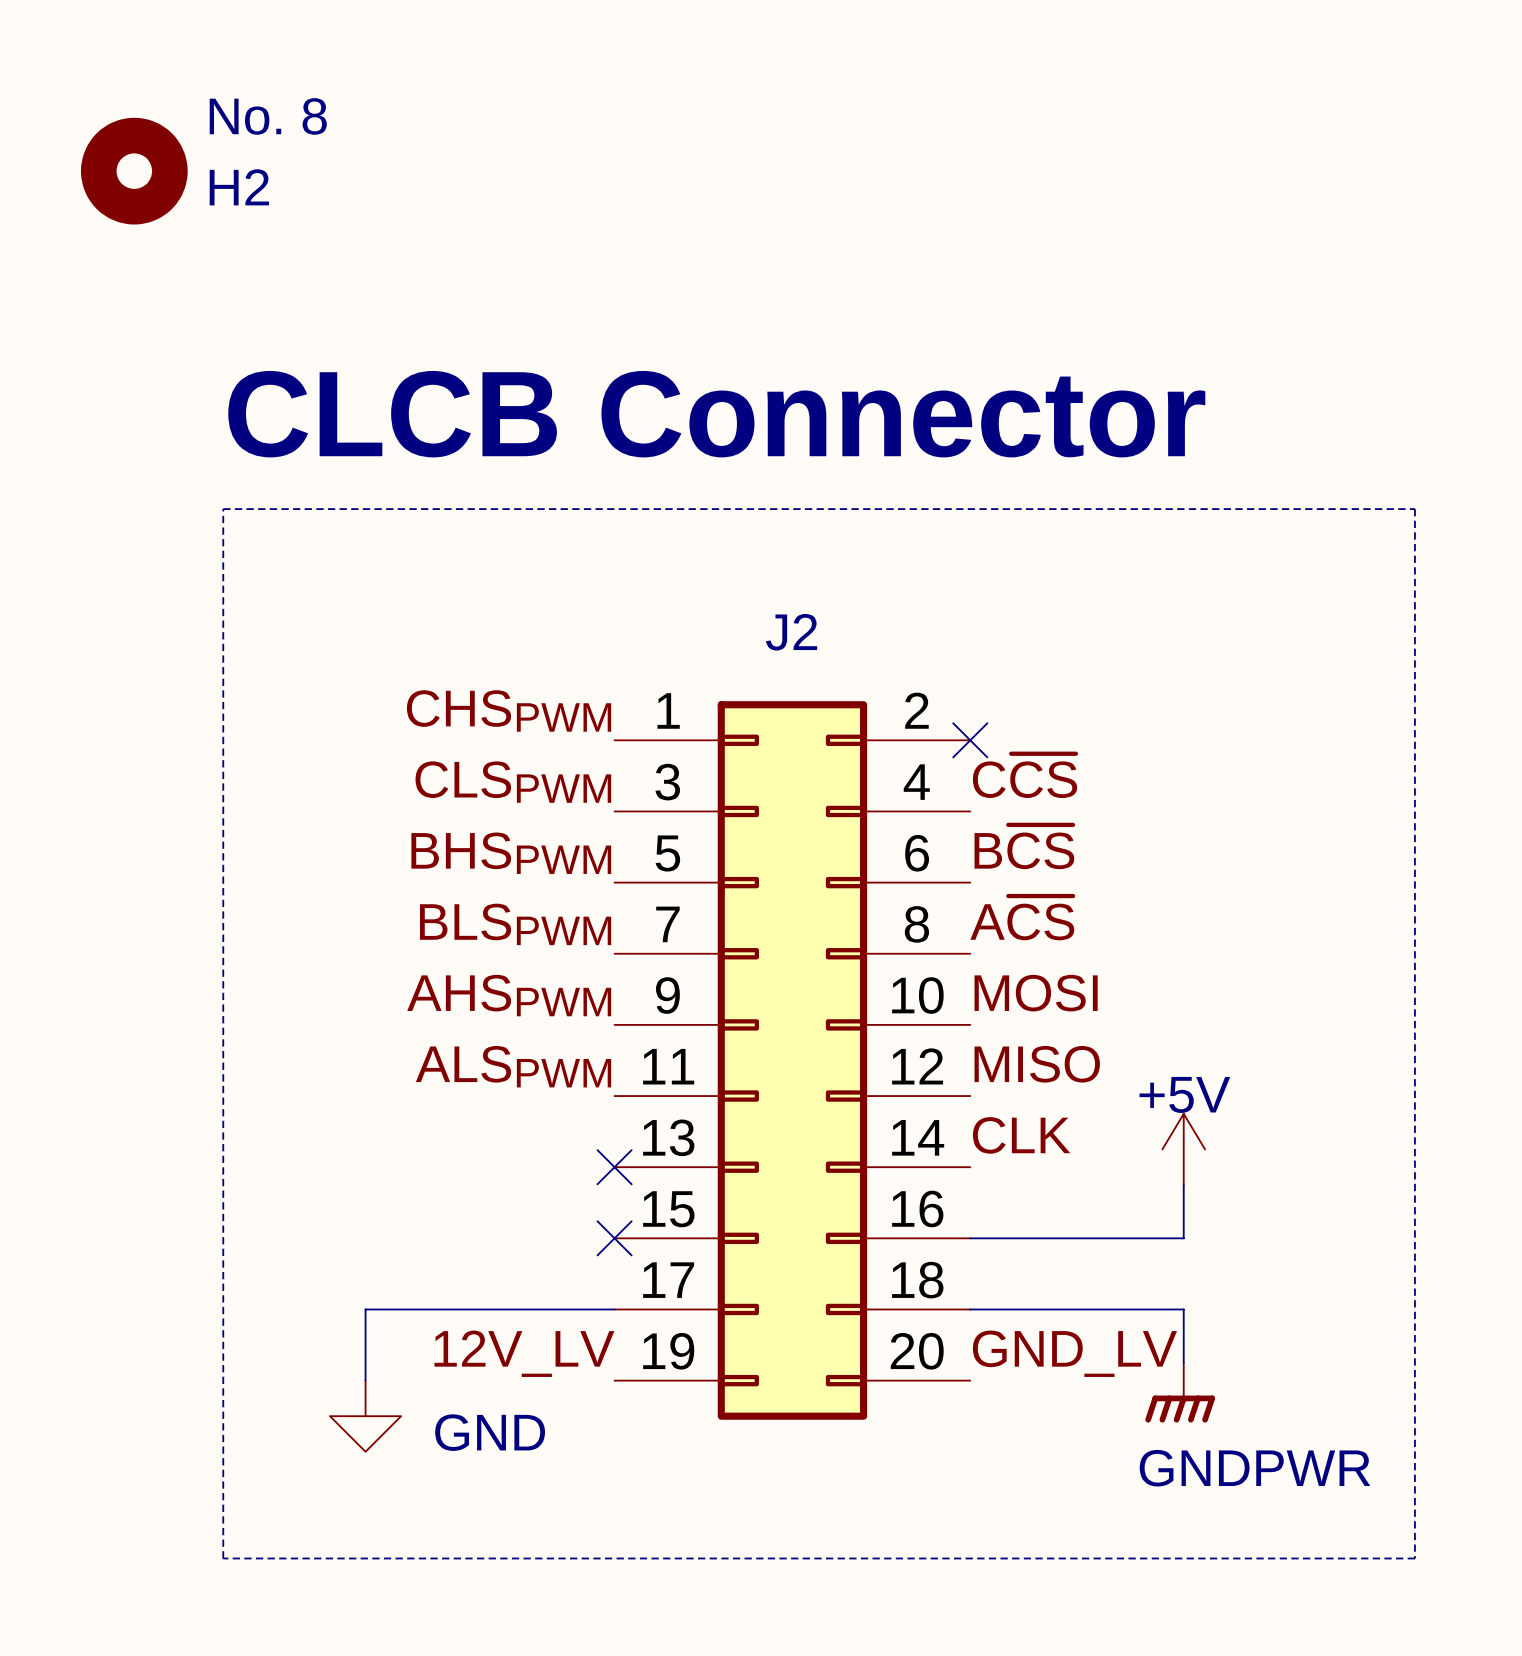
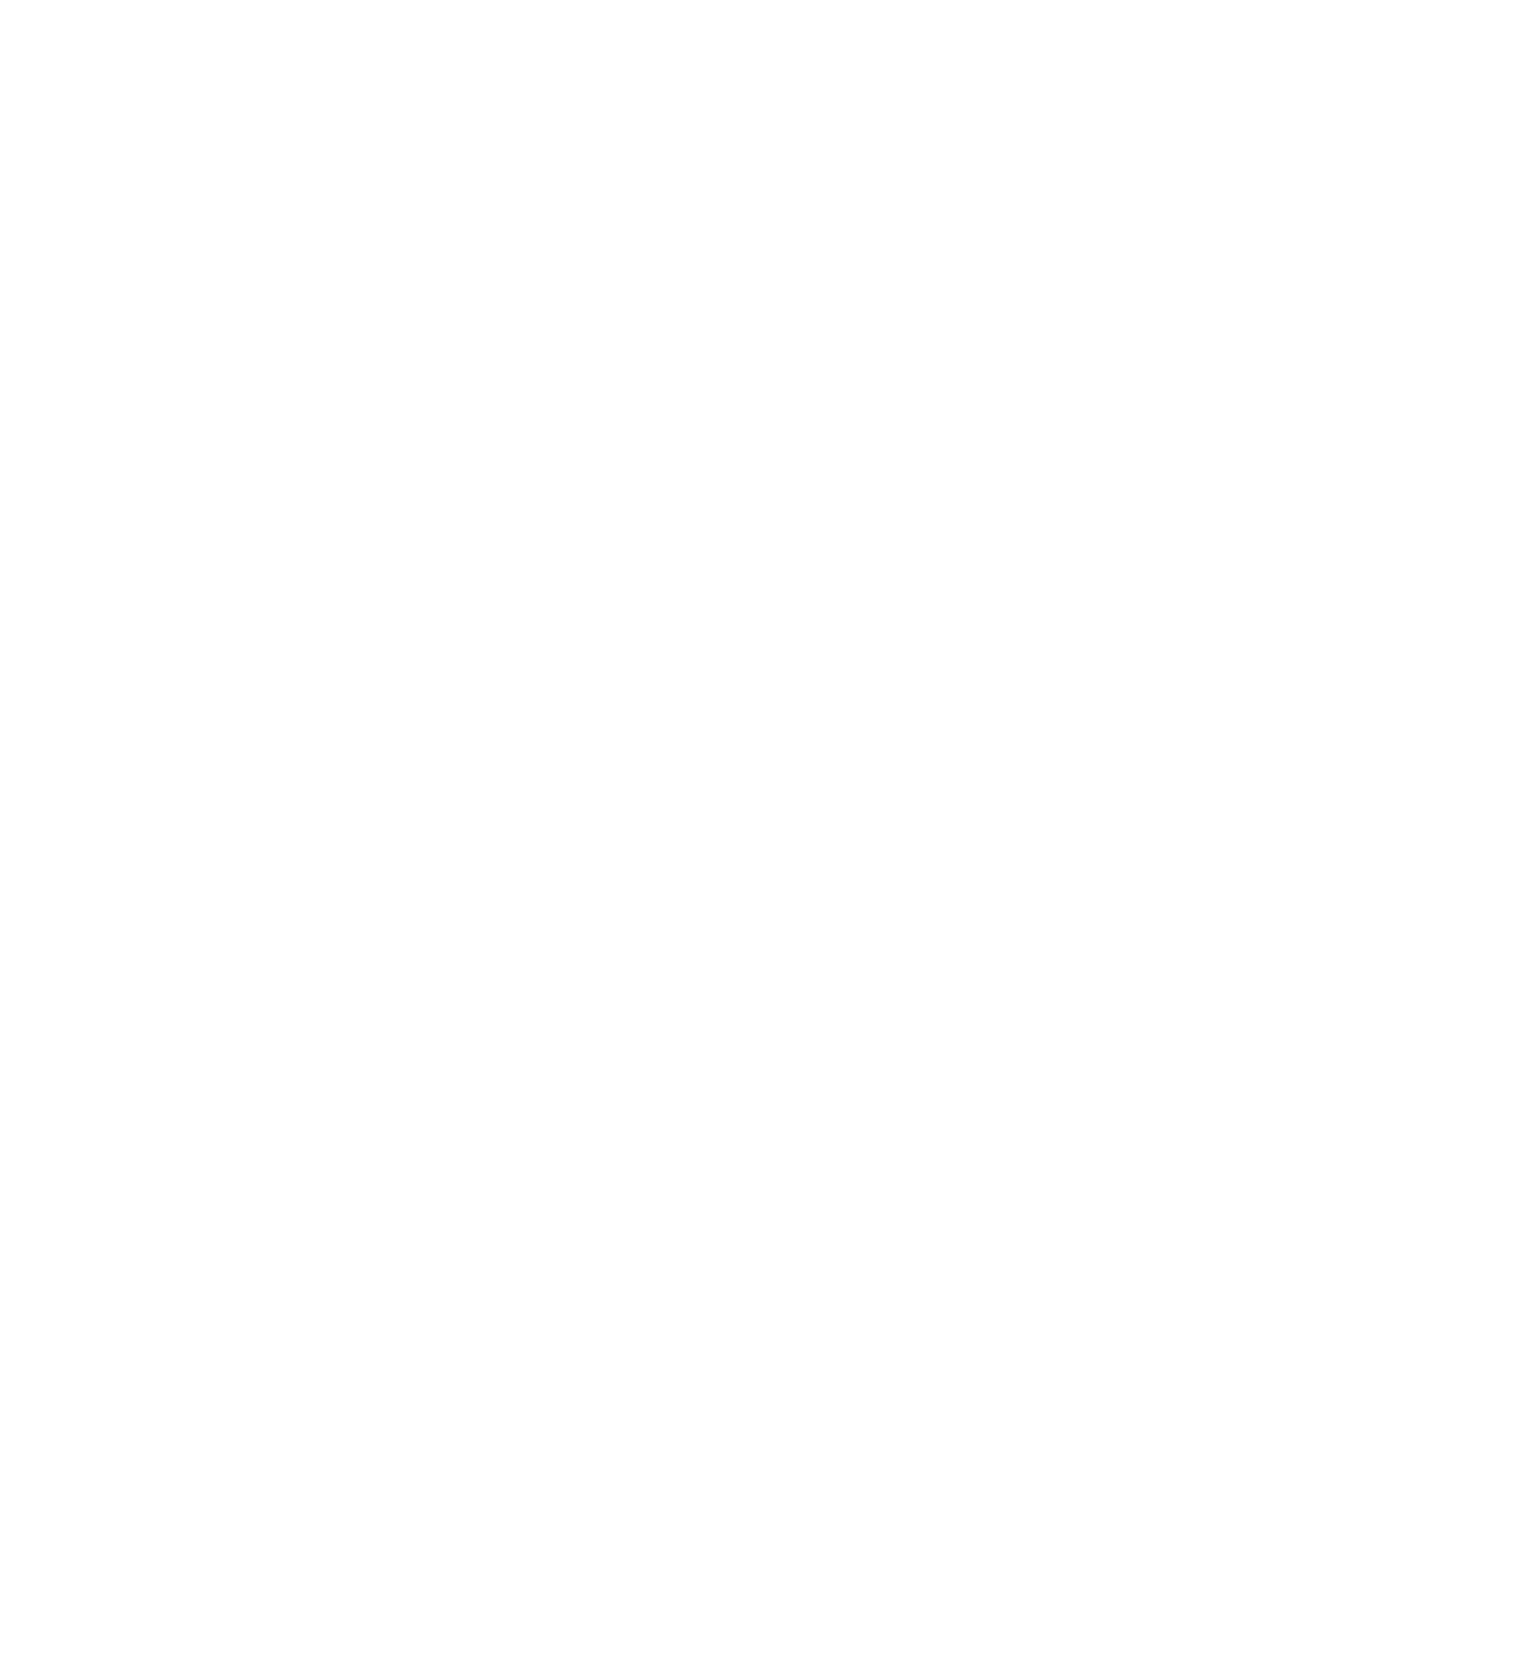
H2: No. 8 (134, 171) -> none
text: CLCB Connector (716, 414) -> none
line: (223, 509) (1414, 509) (1414, 1558) (223, 1558) (223, 509) -> none
label: CHSPWM (509, 710) -> none
no-connect mark: (970, 740) -> none
label: C~{CS} (1025, 775) -> none
label: CLSPWM (513, 782) -> none
label: B~{CS} (1024, 847) -> none
label: BHSPWM (511, 853) -> none
label: A~{CS} (1022, 918) -> none
label: BLSPWM (515, 924) -> none
label: MOSI (1036, 993) -> none
label: AHSPWM (509, 995) -> none
J2: (792, 1060) -> none
label: MISO (1037, 1064) -> none
label: ALSPWM (513, 1066) -> none
label: CLK (1021, 1135) -> none
power symbol: +5V (1183, 1149) -> none
no-connect mark: (614, 1167) -> none
wire: (1183, 1184) (1183, 1238) (970, 1238) -> none
no-connect mark: (614, 1238) -> none
wire: (614, 1309) (365, 1309) (365, 1380) -> none
wire: (970, 1309) (1183, 1309) (1183, 1362) -> none
label: 12V_LV (524, 1353) -> none
label: GND_LV (1074, 1353) -> none
power symbol: GNDPWR (1180, 1392) -> none
power symbol: GND (365, 1416) -> none

